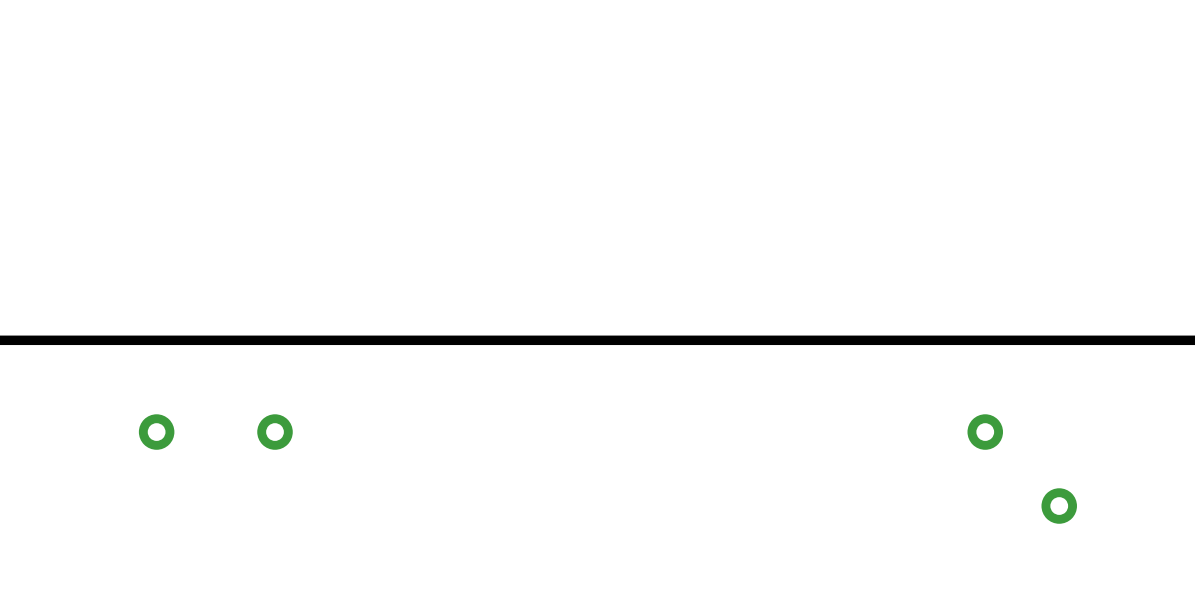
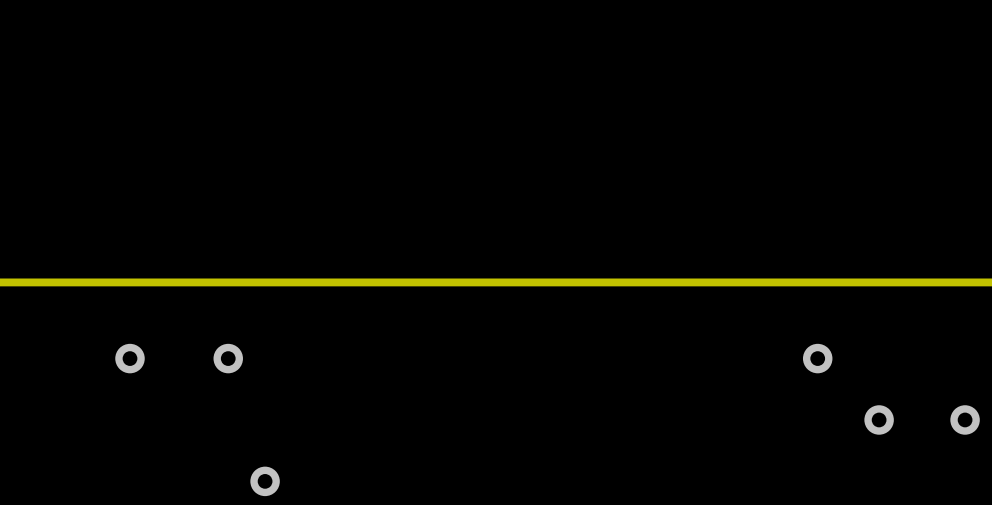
via: none -> (965, 419)
via: none -> (265, 481)

